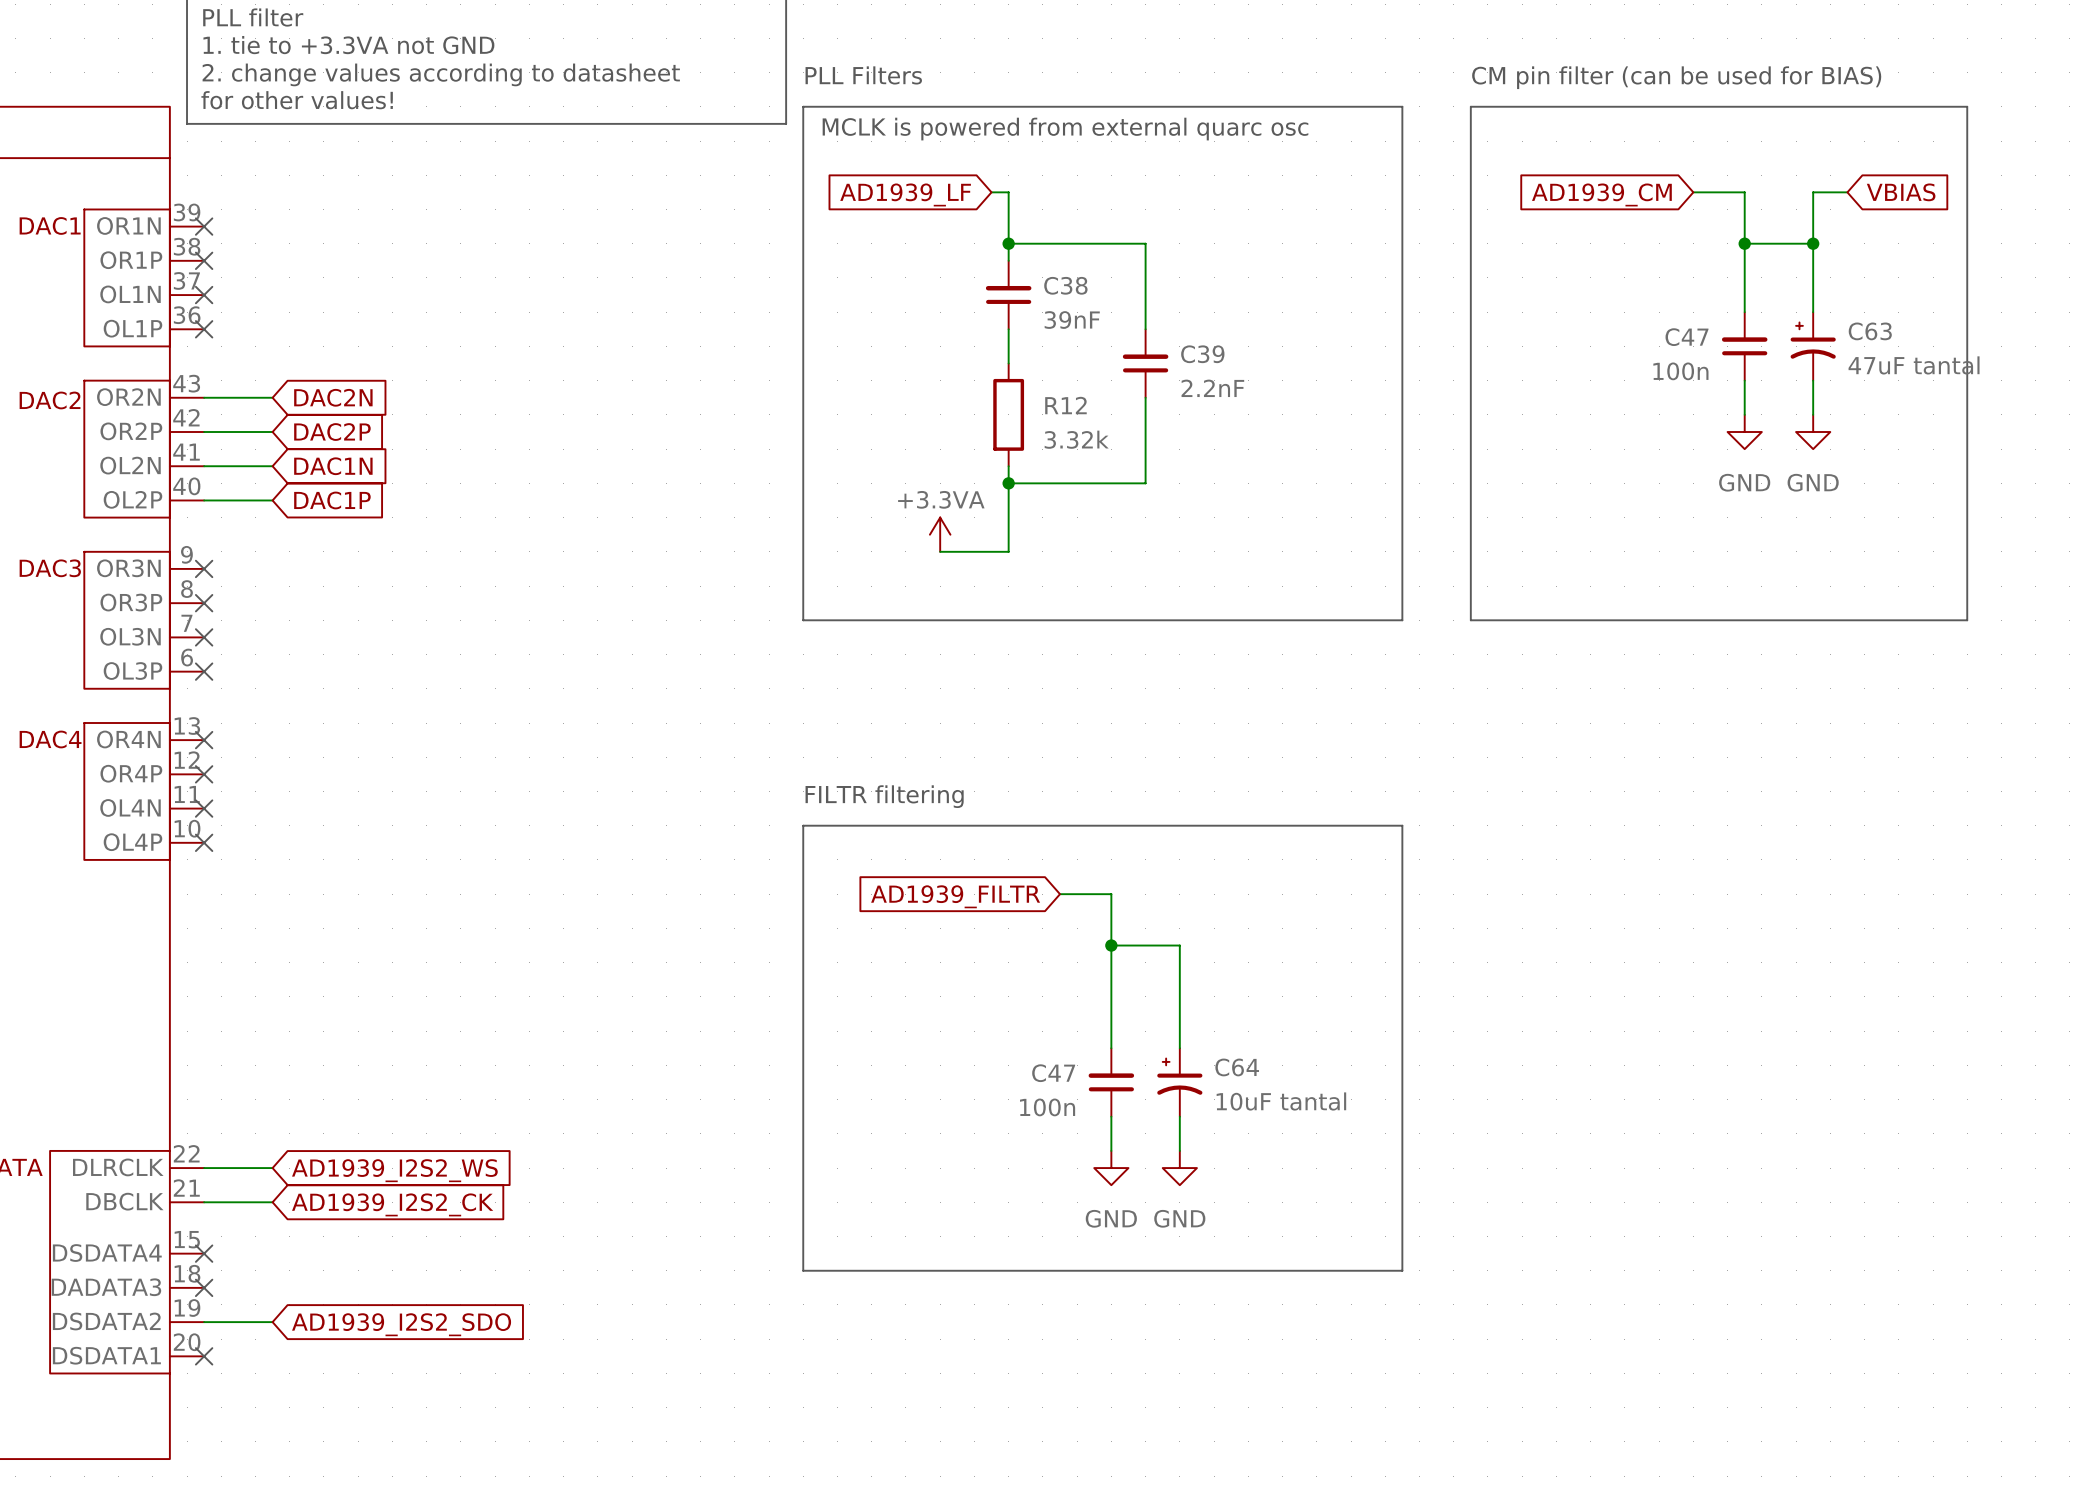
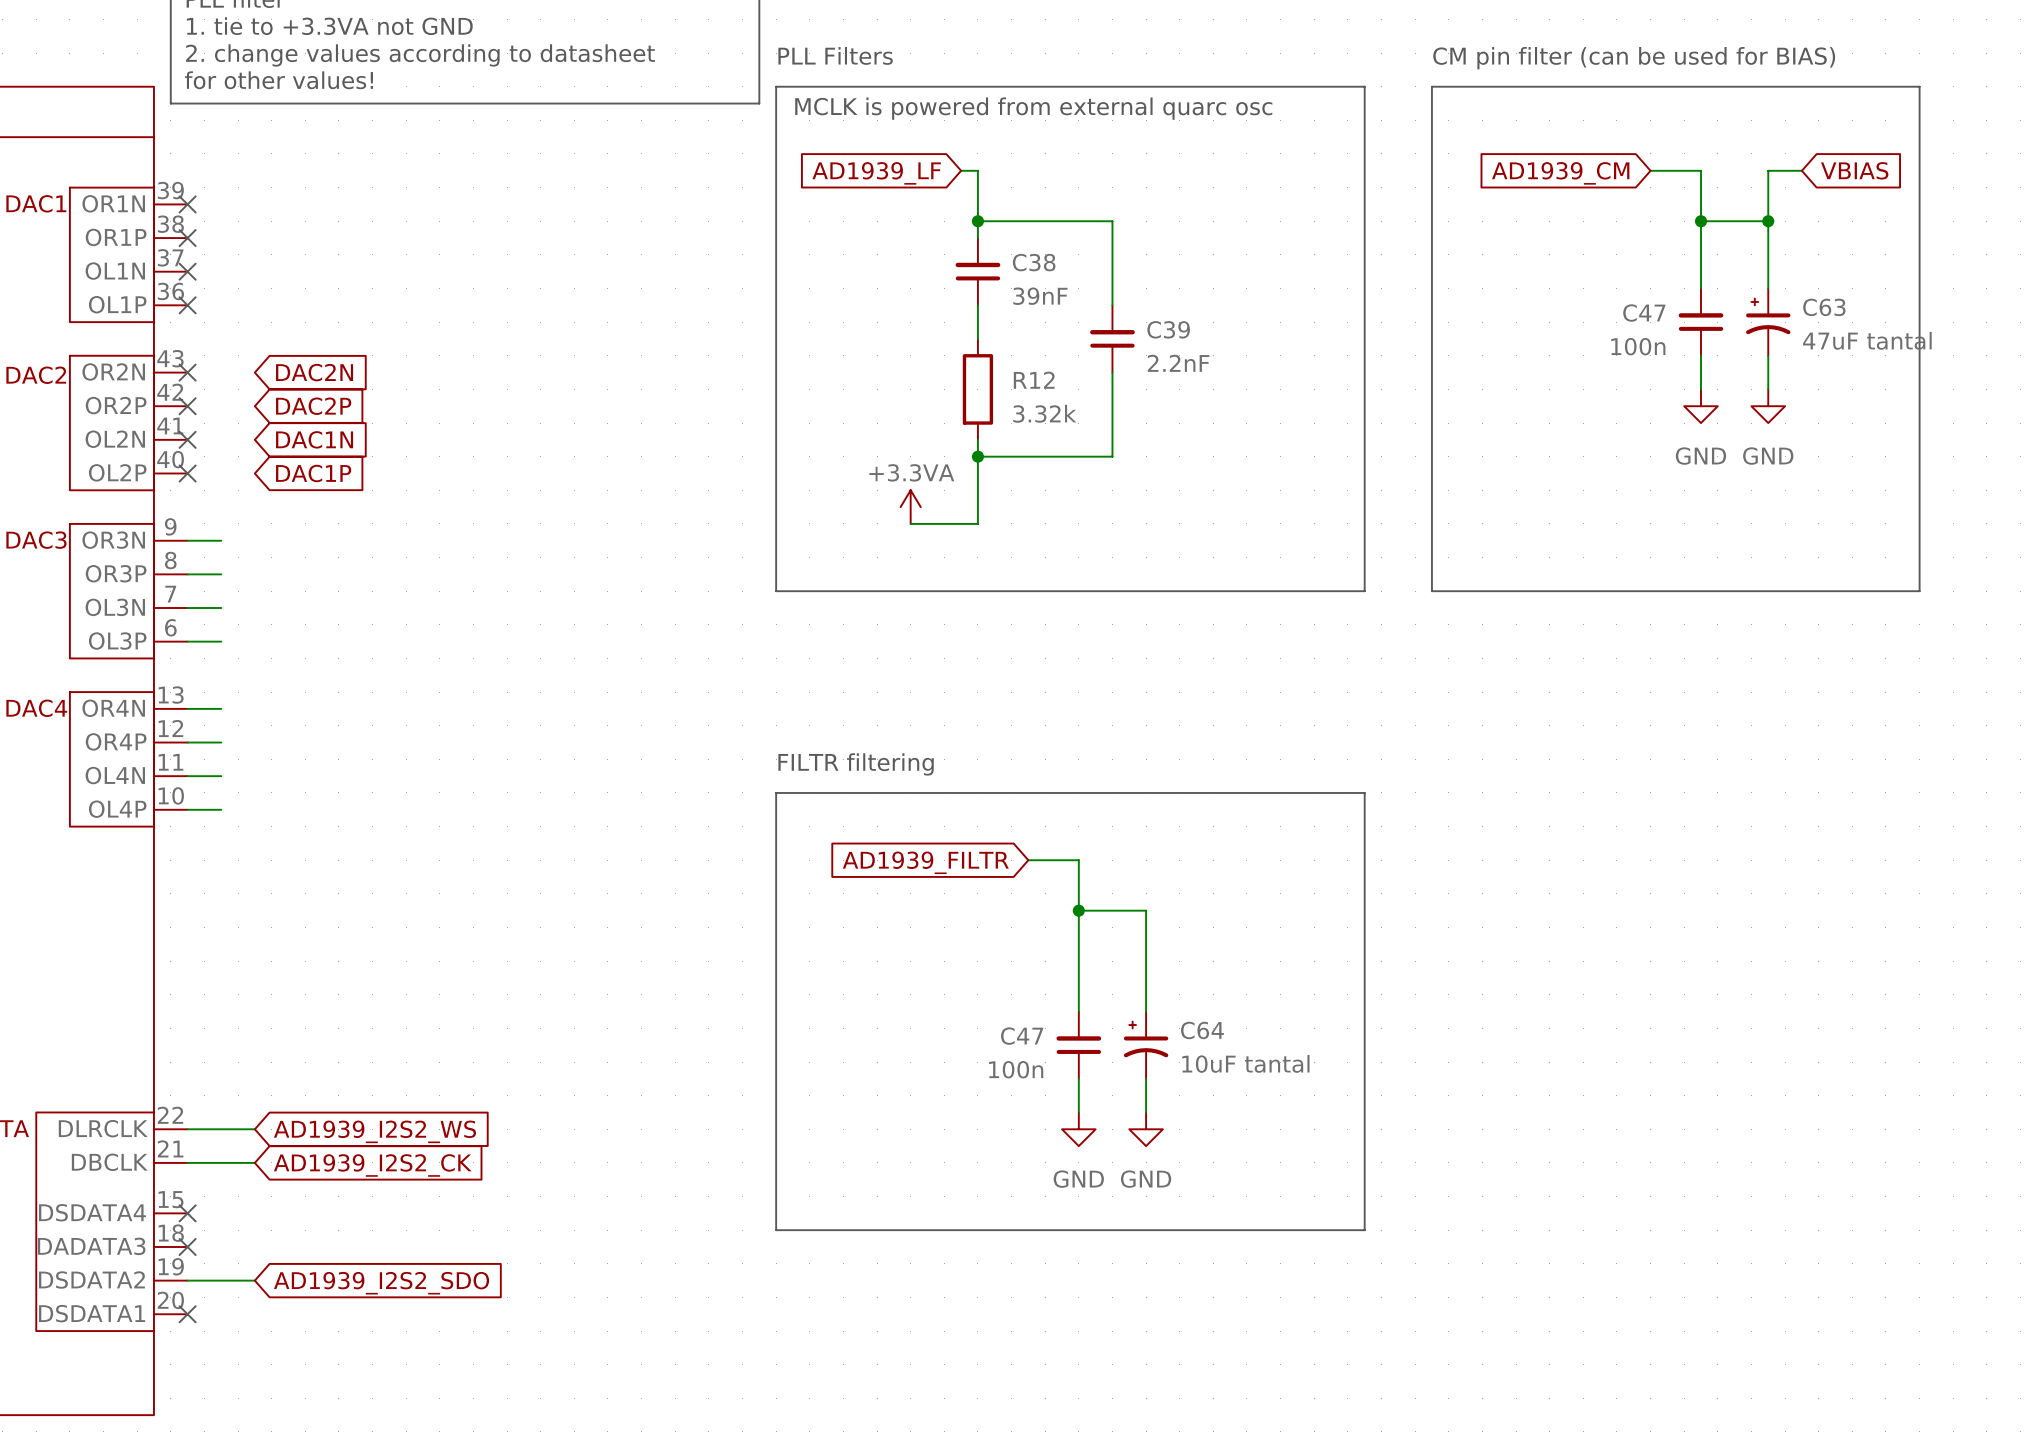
wire: (204, 397) (272, 397) -> none
no-connect mark: none -> (187, 372)
wire: (204, 432) (272, 432) -> none
no-connect mark: none -> (187, 406)
wire: (204, 466) (272, 466) -> none
no-connect mark: none -> (187, 439)
wire: (204, 500) (272, 500) -> none
no-connect mark: none -> (187, 473)
wire: none -> (187, 540) (221, 540)
no-connect mark: (204, 568) -> none
wire: none -> (187, 574) (221, 574)
no-connect mark: (204, 603) -> none
wire: none -> (187, 608) (221, 608)
no-connect mark: (204, 637) -> none
wire: none -> (187, 641) (221, 641)
no-connect mark: (204, 671) -> none
wire: none -> (187, 708) (221, 708)
no-connect mark: (204, 740) -> none
wire: none -> (187, 742) (221, 742)
no-connect mark: (204, 774) -> none
wire: none -> (187, 776) (221, 776)
no-connect mark: (204, 808) -> none
wire: none -> (187, 809) (221, 809)
no-connect mark: (204, 842) -> none

